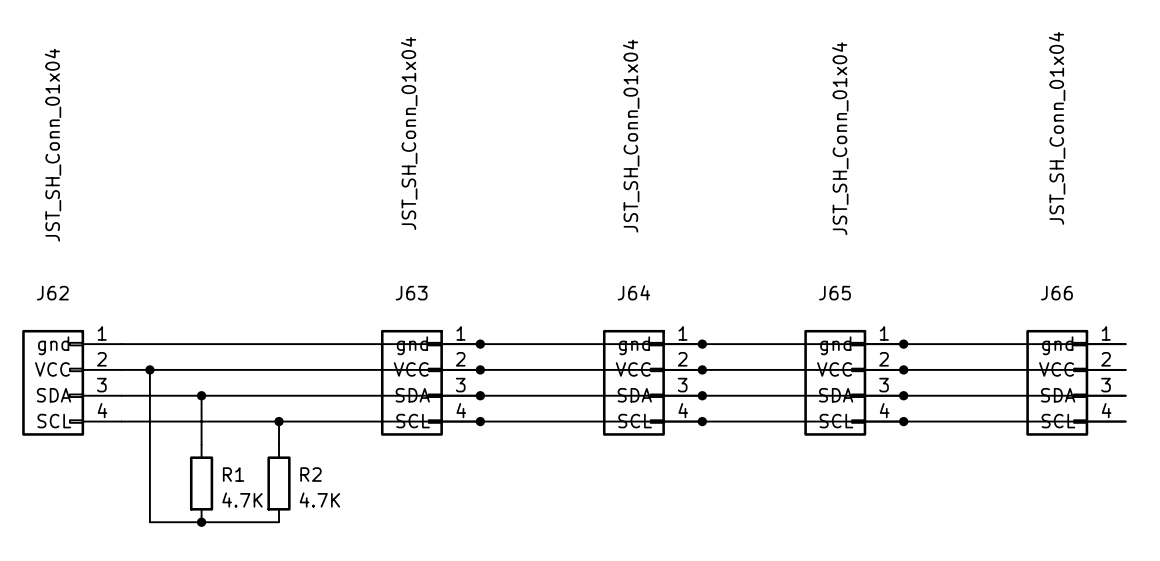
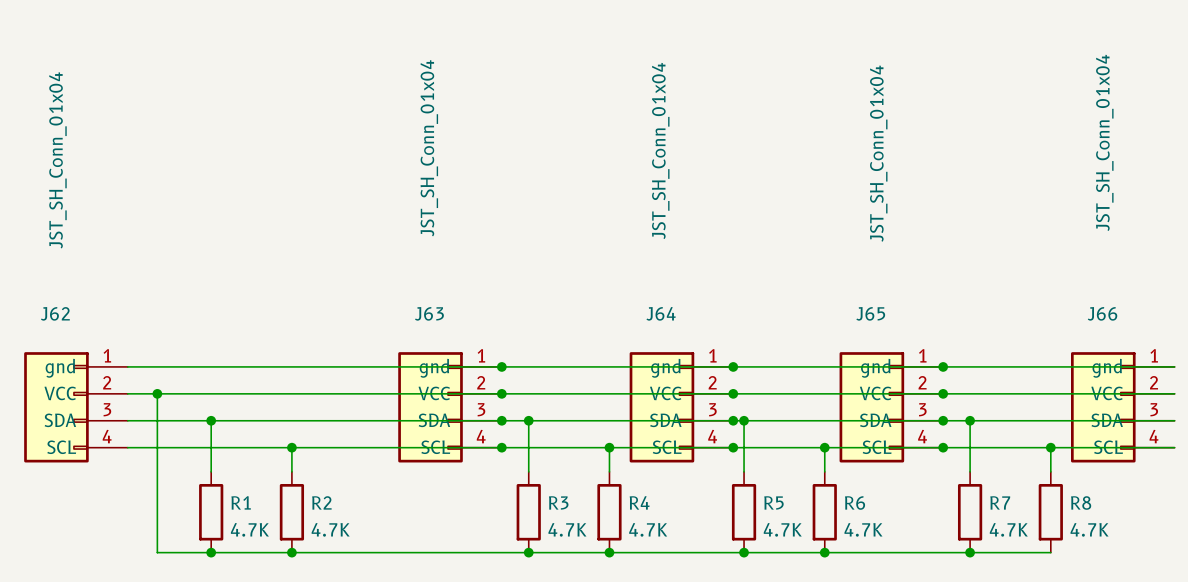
wire: none -> (528, 420) (528, 471)
junction: none -> (528, 420)
wire: none -> (744, 420) (744, 471)
junction: none -> (744, 420)
wire: none -> (970, 420) (970, 471)
junction: none -> (970, 420)
wire: none -> (609, 447) (609, 471)
junction: none -> (609, 447)
wire: none -> (824, 447) (824, 471)
junction: none -> (824, 447)
wire: none -> (1050, 447) (1050, 471)
junction: none -> (1050, 447)
R3: none -> 4.7K (528, 512)
R4: none -> 4.7K (609, 512)
R5: none -> 4.7K (744, 512)
R6: none -> 4.7K (824, 512)
R7: none -> 4.7K (970, 512)
R8: none -> 4.7K (1050, 512)
wire: none -> (291, 552) (1050, 552)
junction: none -> (291, 552)
junction: none -> (528, 552)
junction: none -> (609, 552)
junction: none -> (744, 552)
junction: none -> (824, 552)
junction: none -> (970, 552)

